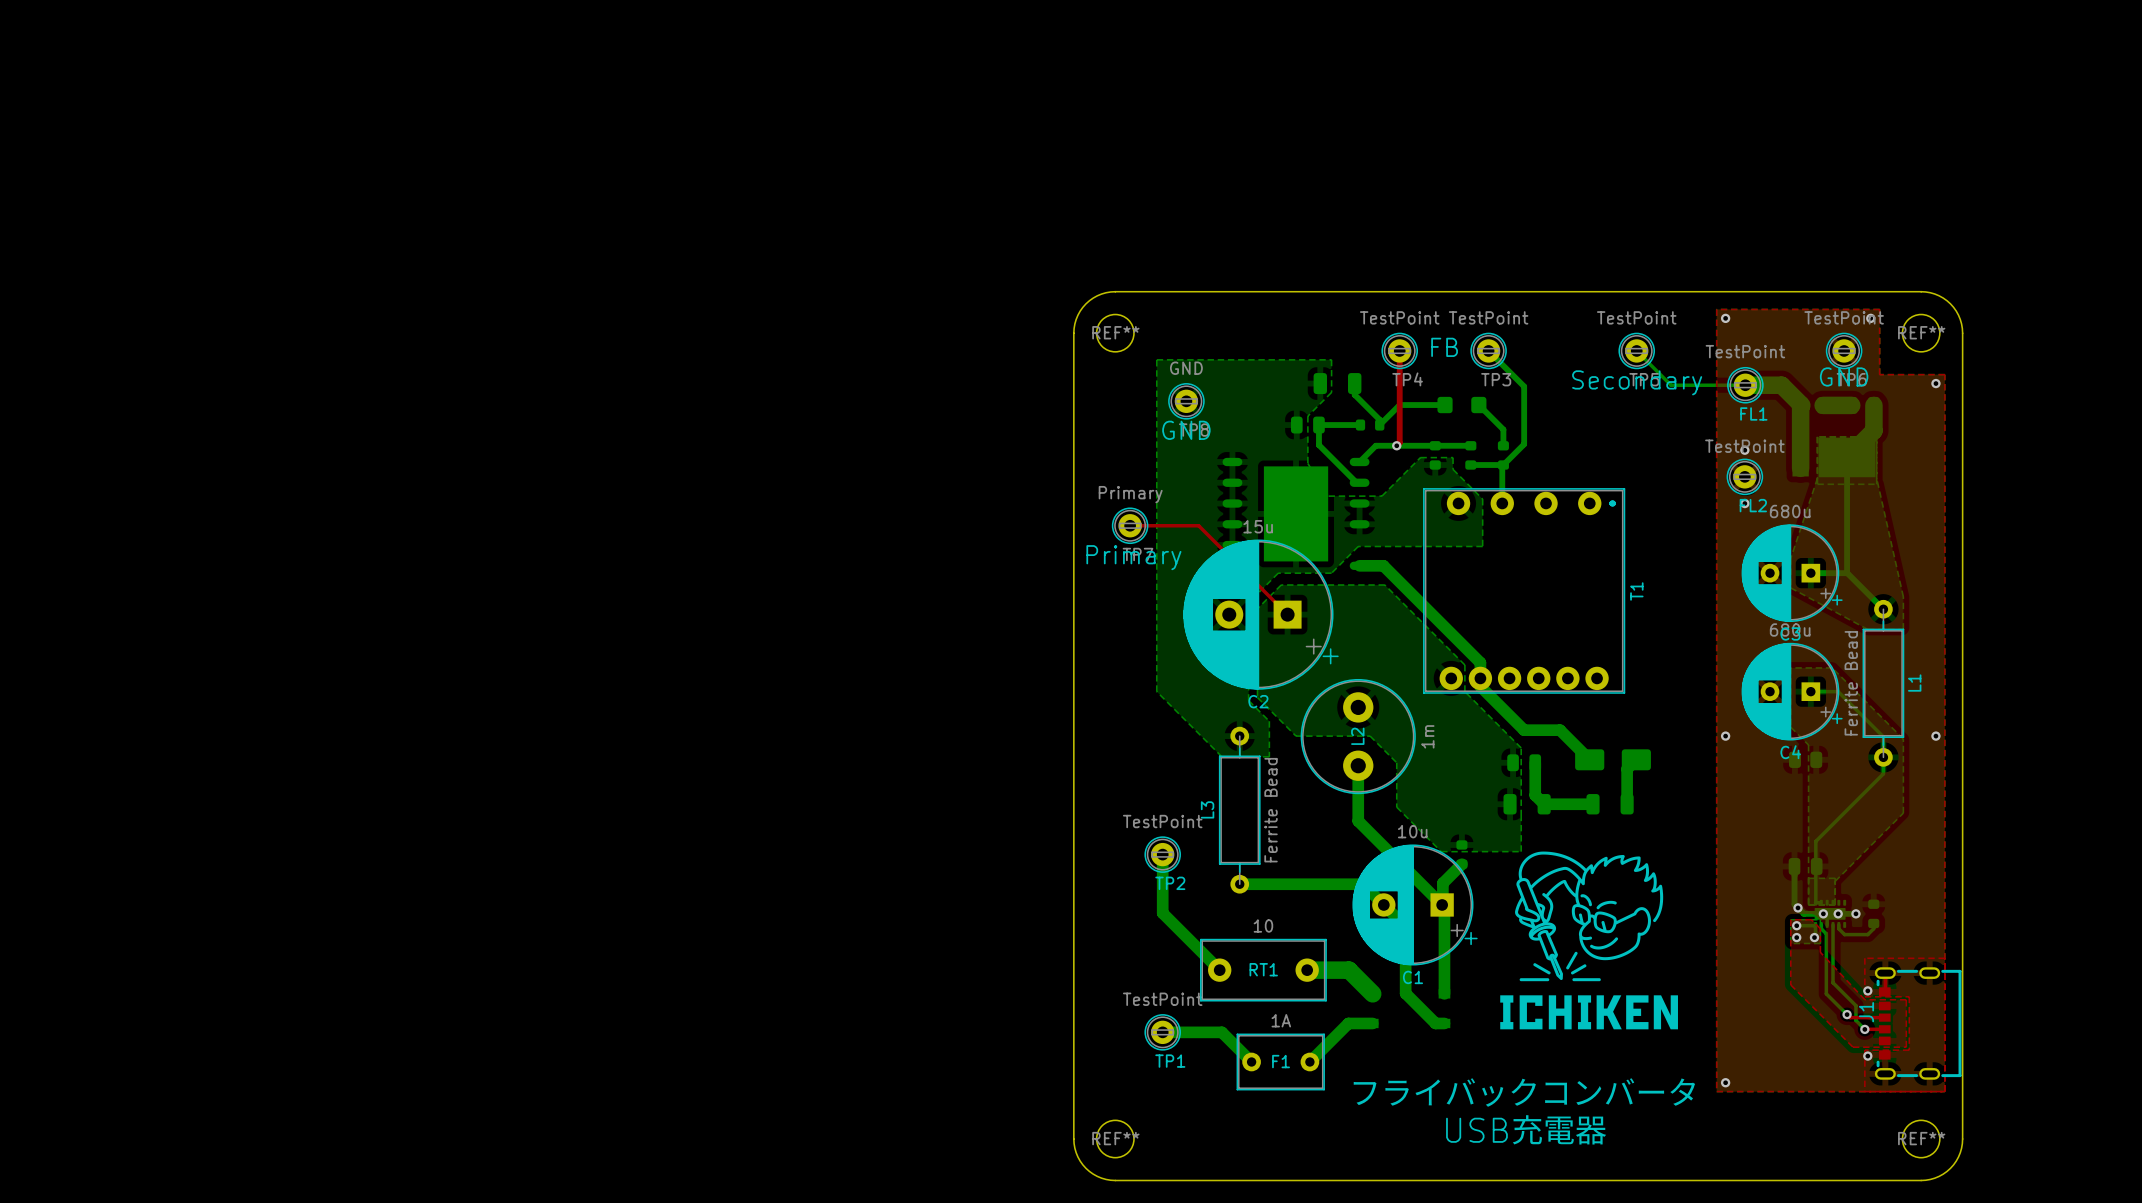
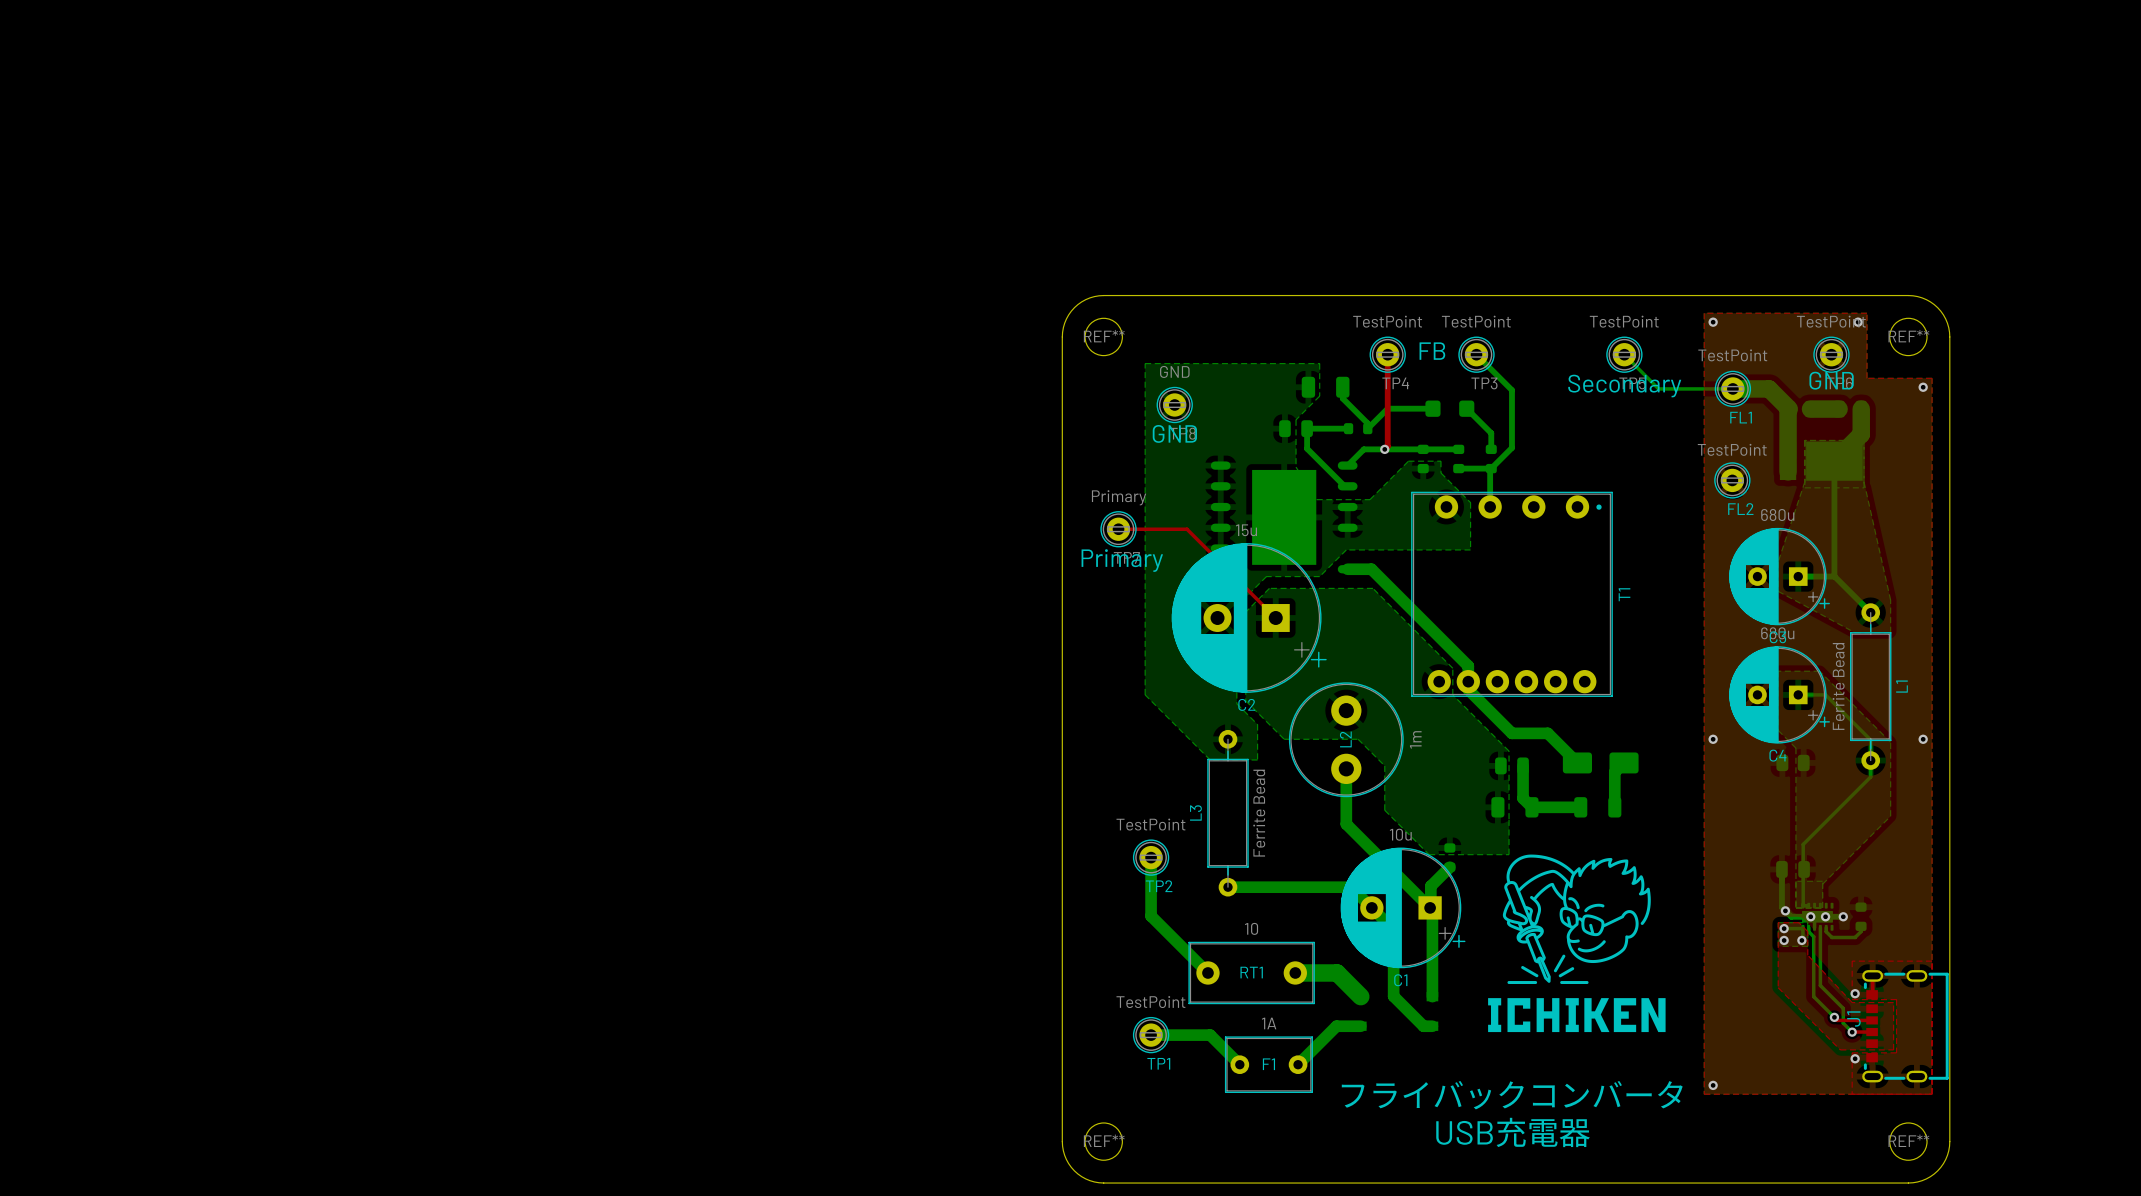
via: (1744, 450) -> none
via: (1744, 503) -> none

